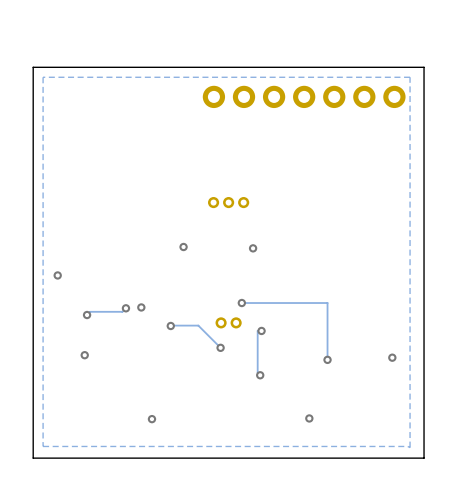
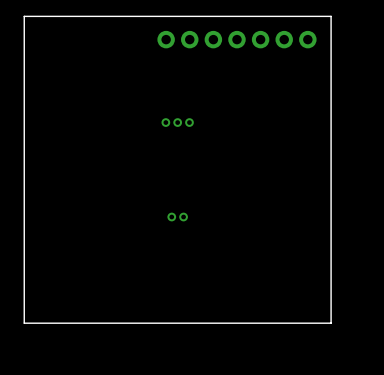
zone outline: (410, 77) (410, 447) (43, 446) (43, 77) (410, 77) -> none
via: (183, 247) -> none
via: (253, 248) -> none
via: (57, 275) -> none
track: (241, 303) (327, 303) (327, 359) -> none
via: (241, 303) -> none
via: (141, 307) -> none
track: (125, 308) (122, 311) (90, 311) (87, 315) -> none
via: (125, 308) -> none
via: (87, 315) -> none
track: (170, 325) (198, 325) (220, 347) -> none
via: (170, 325) -> none
track: (261, 330) (257, 330) (257, 372) (260, 375) -> none
via: (261, 330) -> none
via: (220, 347) -> none
via: (84, 355) -> none
via: (392, 357) -> none
via: (327, 359) -> none
via: (260, 375) -> none
via: (309, 418) -> none
via: (151, 419) -> none

